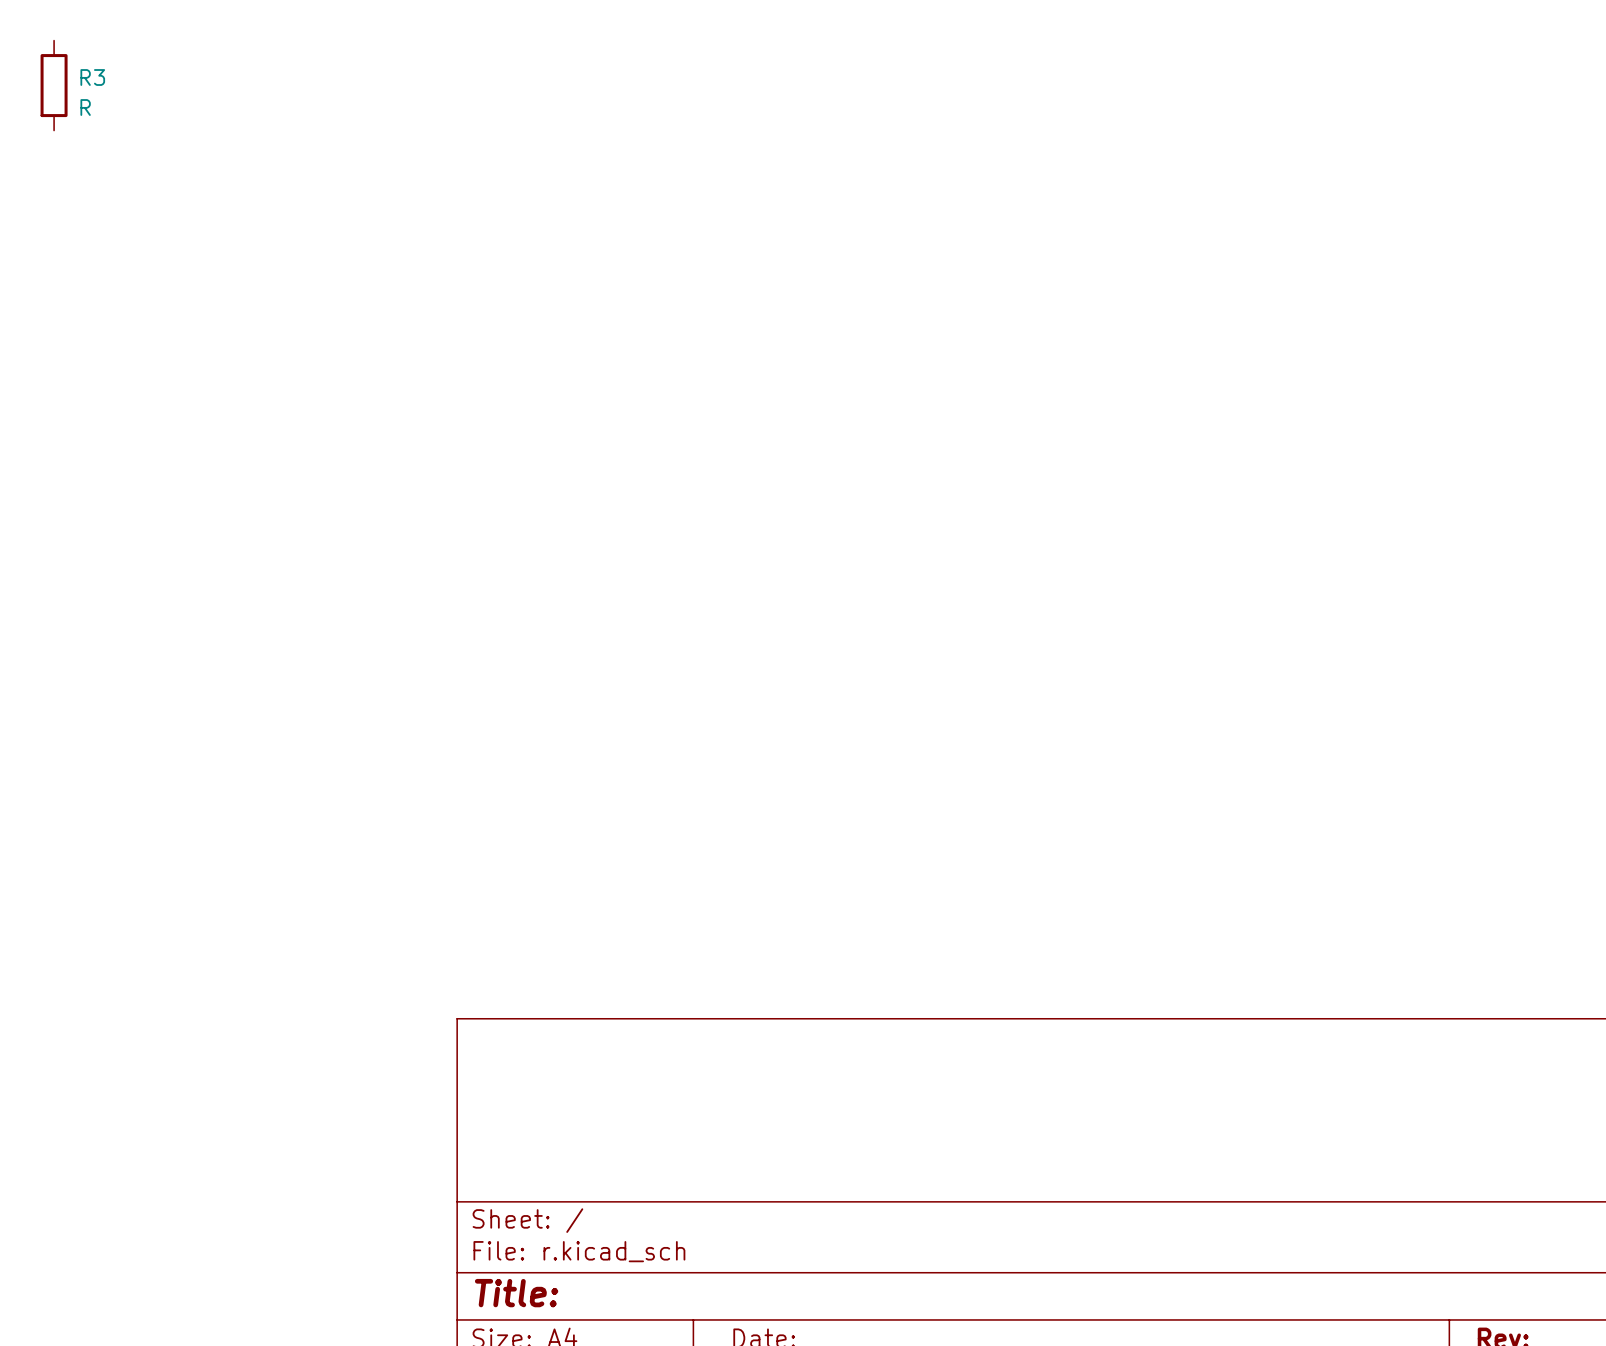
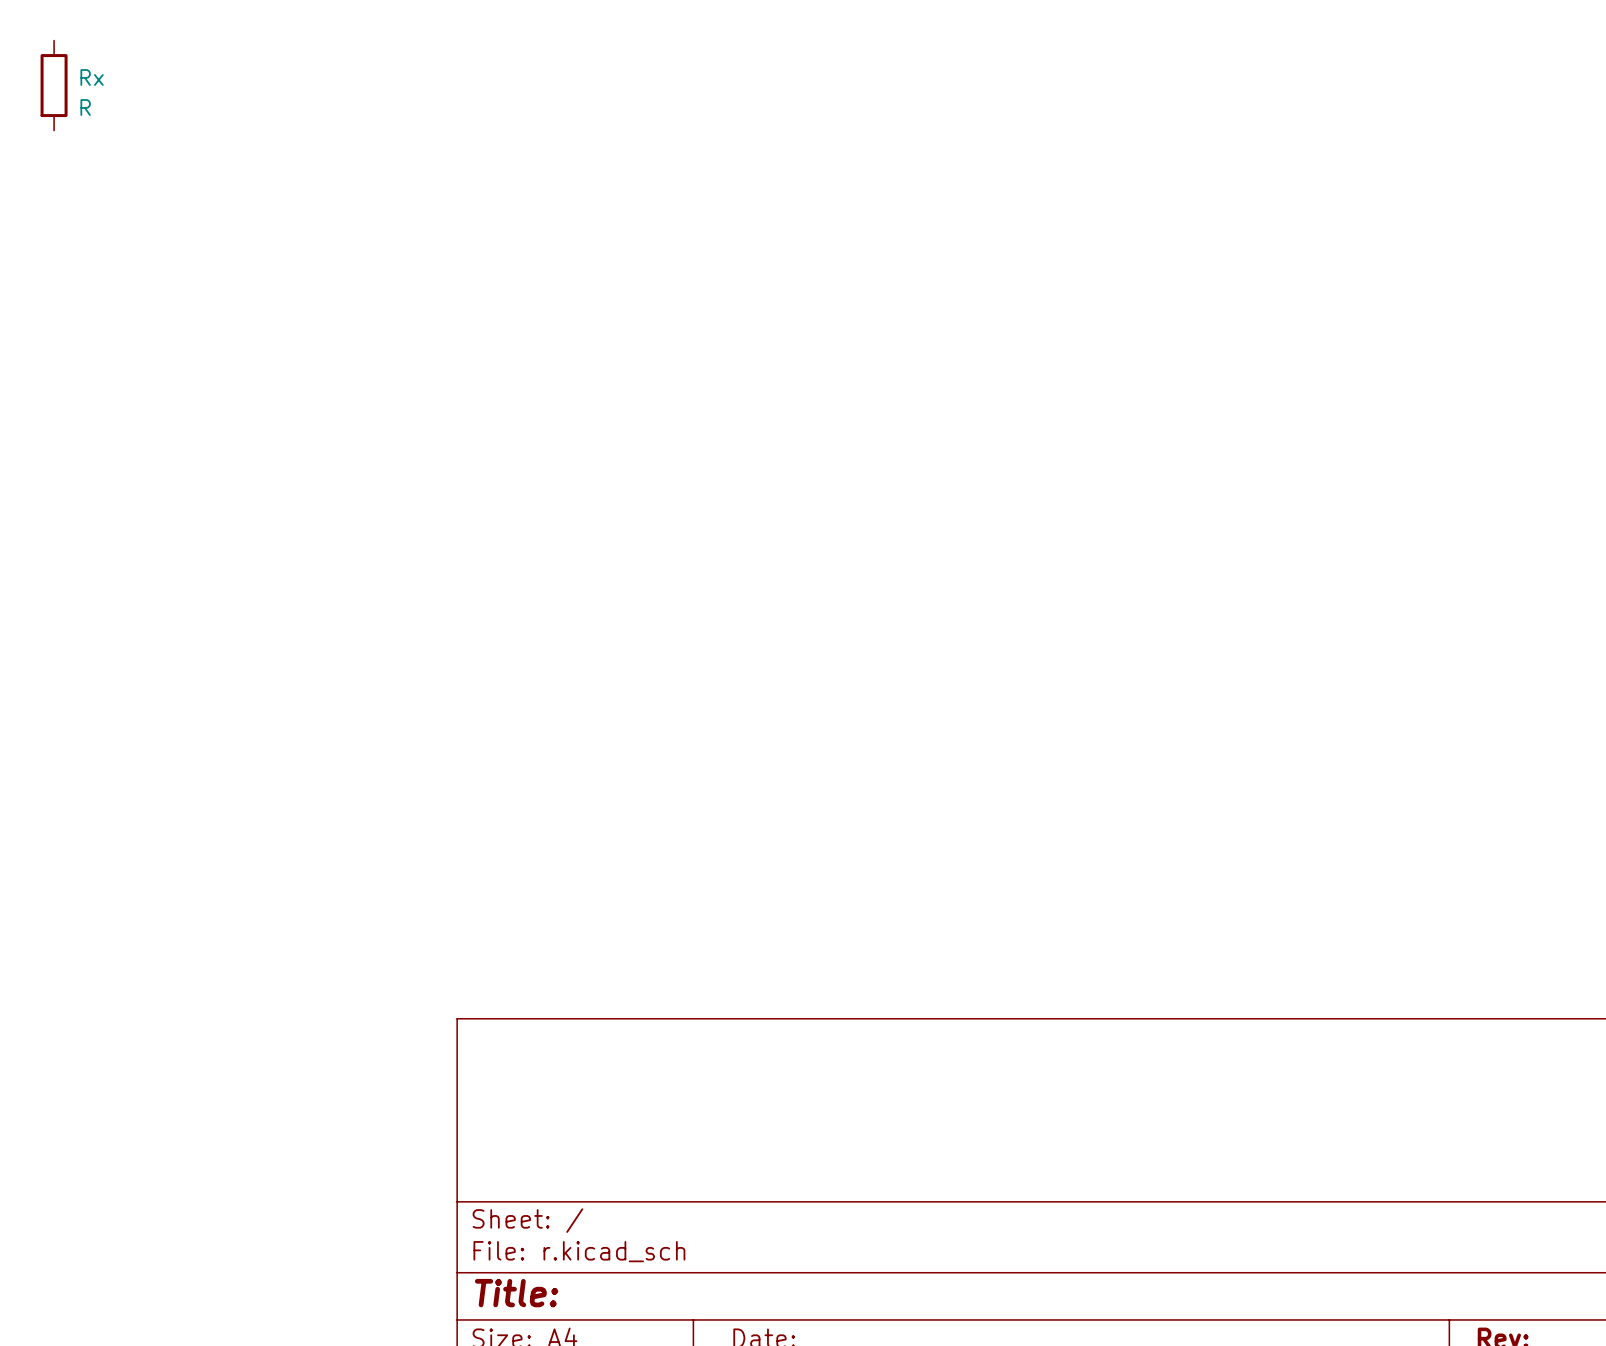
R3 name: R3 (92, 77) -> Rx (92, 77)

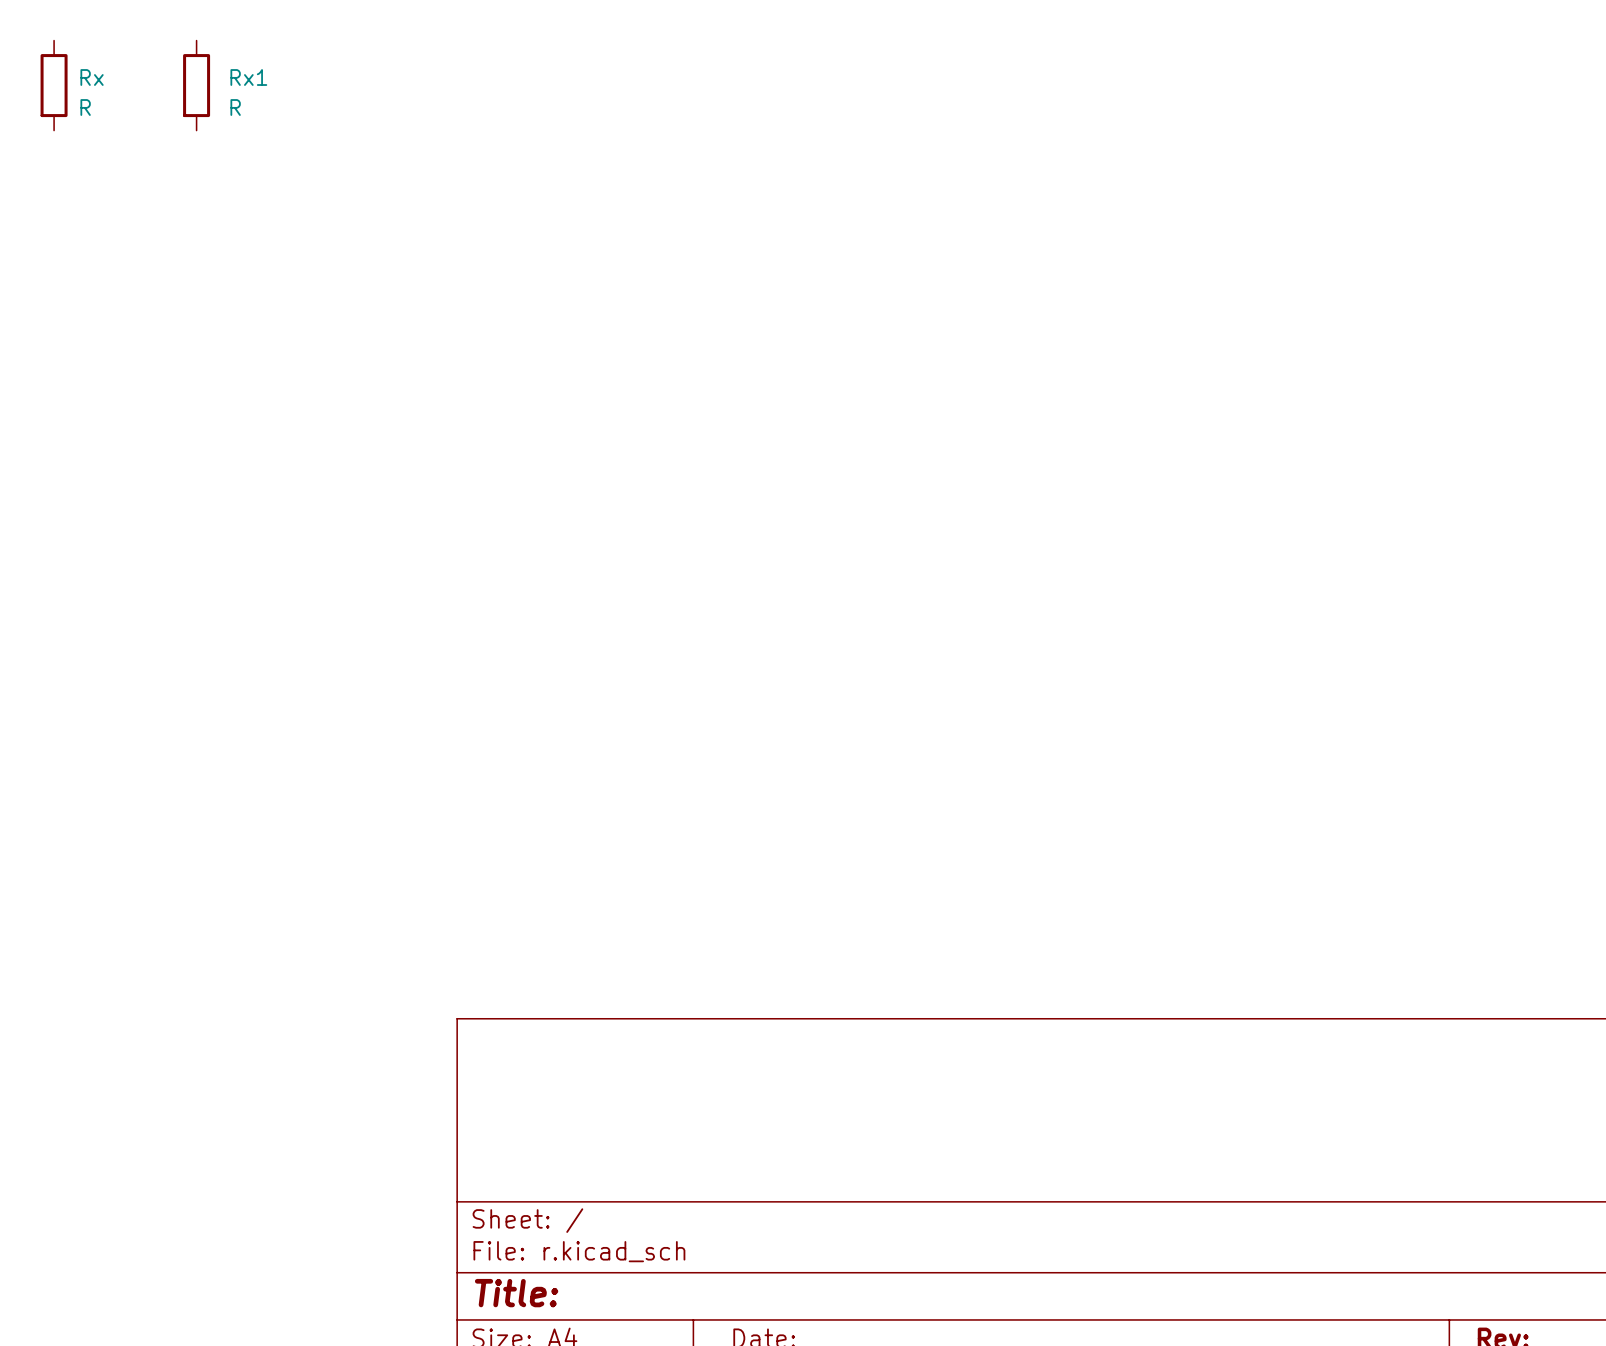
Rx1: none -> R (196, 85)

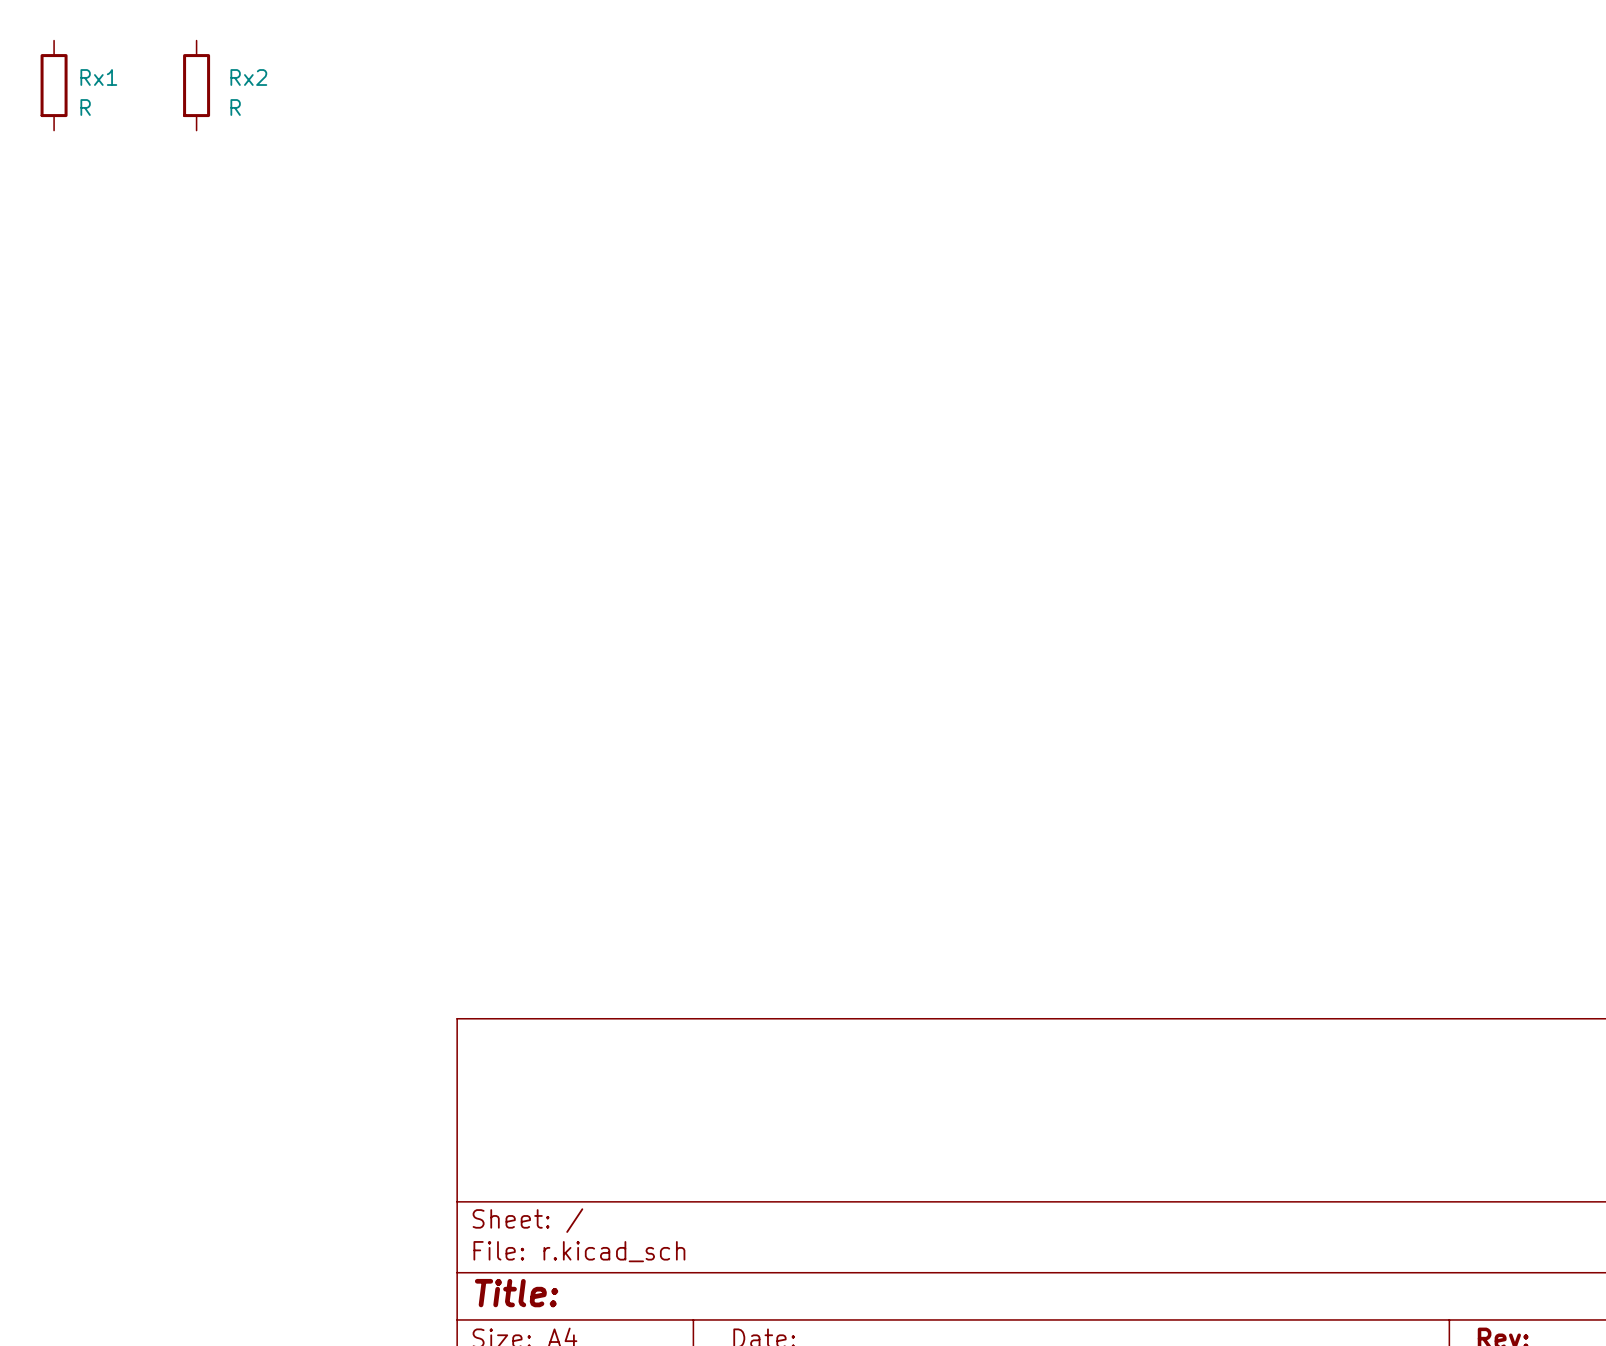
Rx name: Rx (92, 77) -> Rx1 (98, 77)
Rx1 name: Rx1 (248, 77) -> Rx2 (248, 77)

